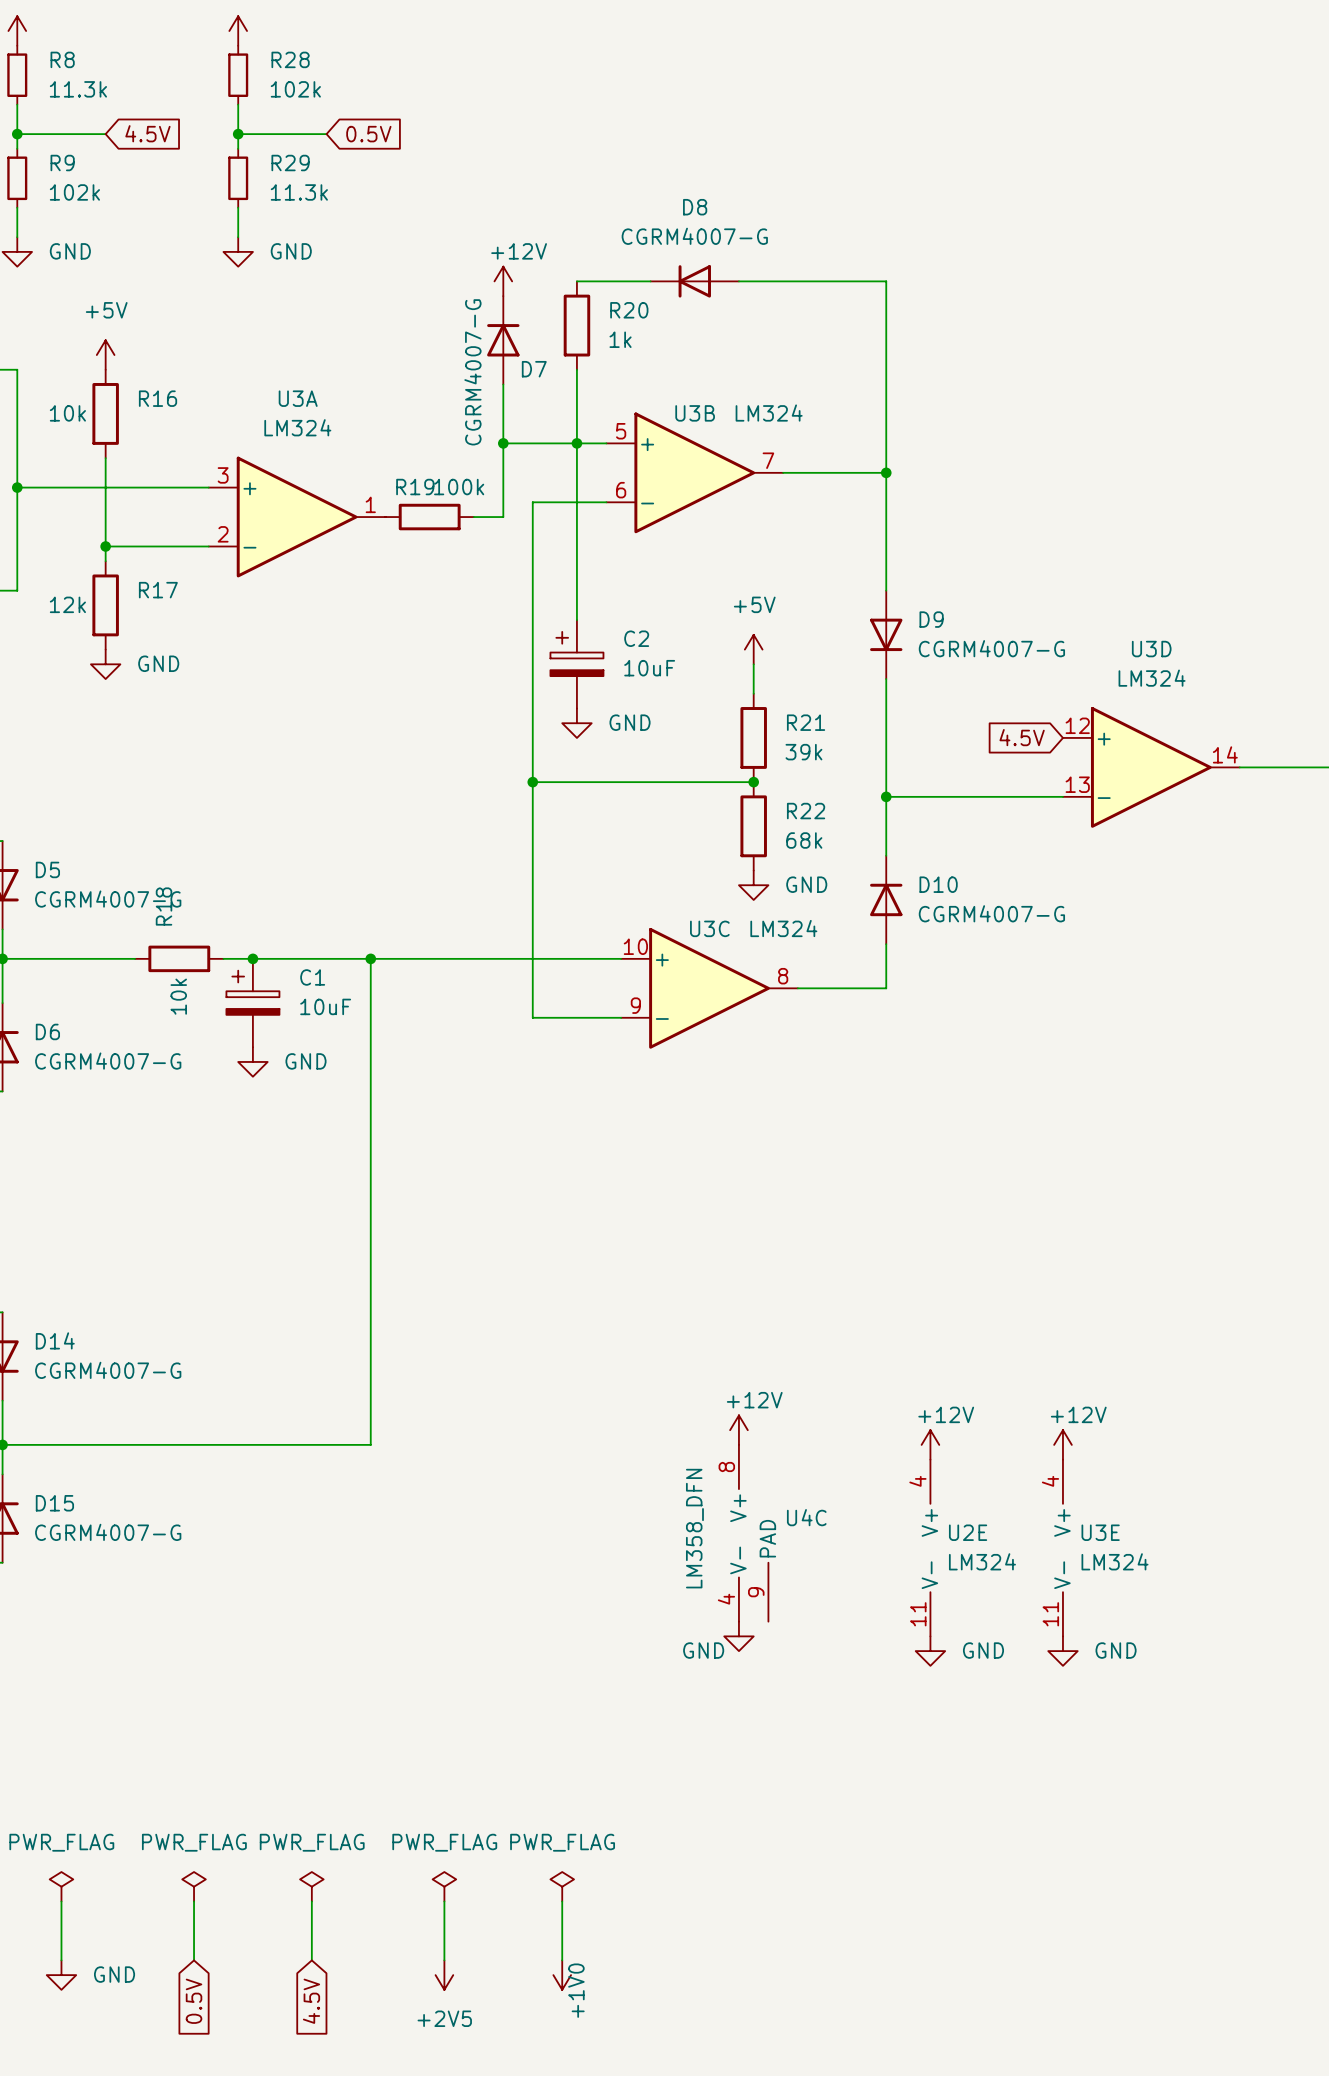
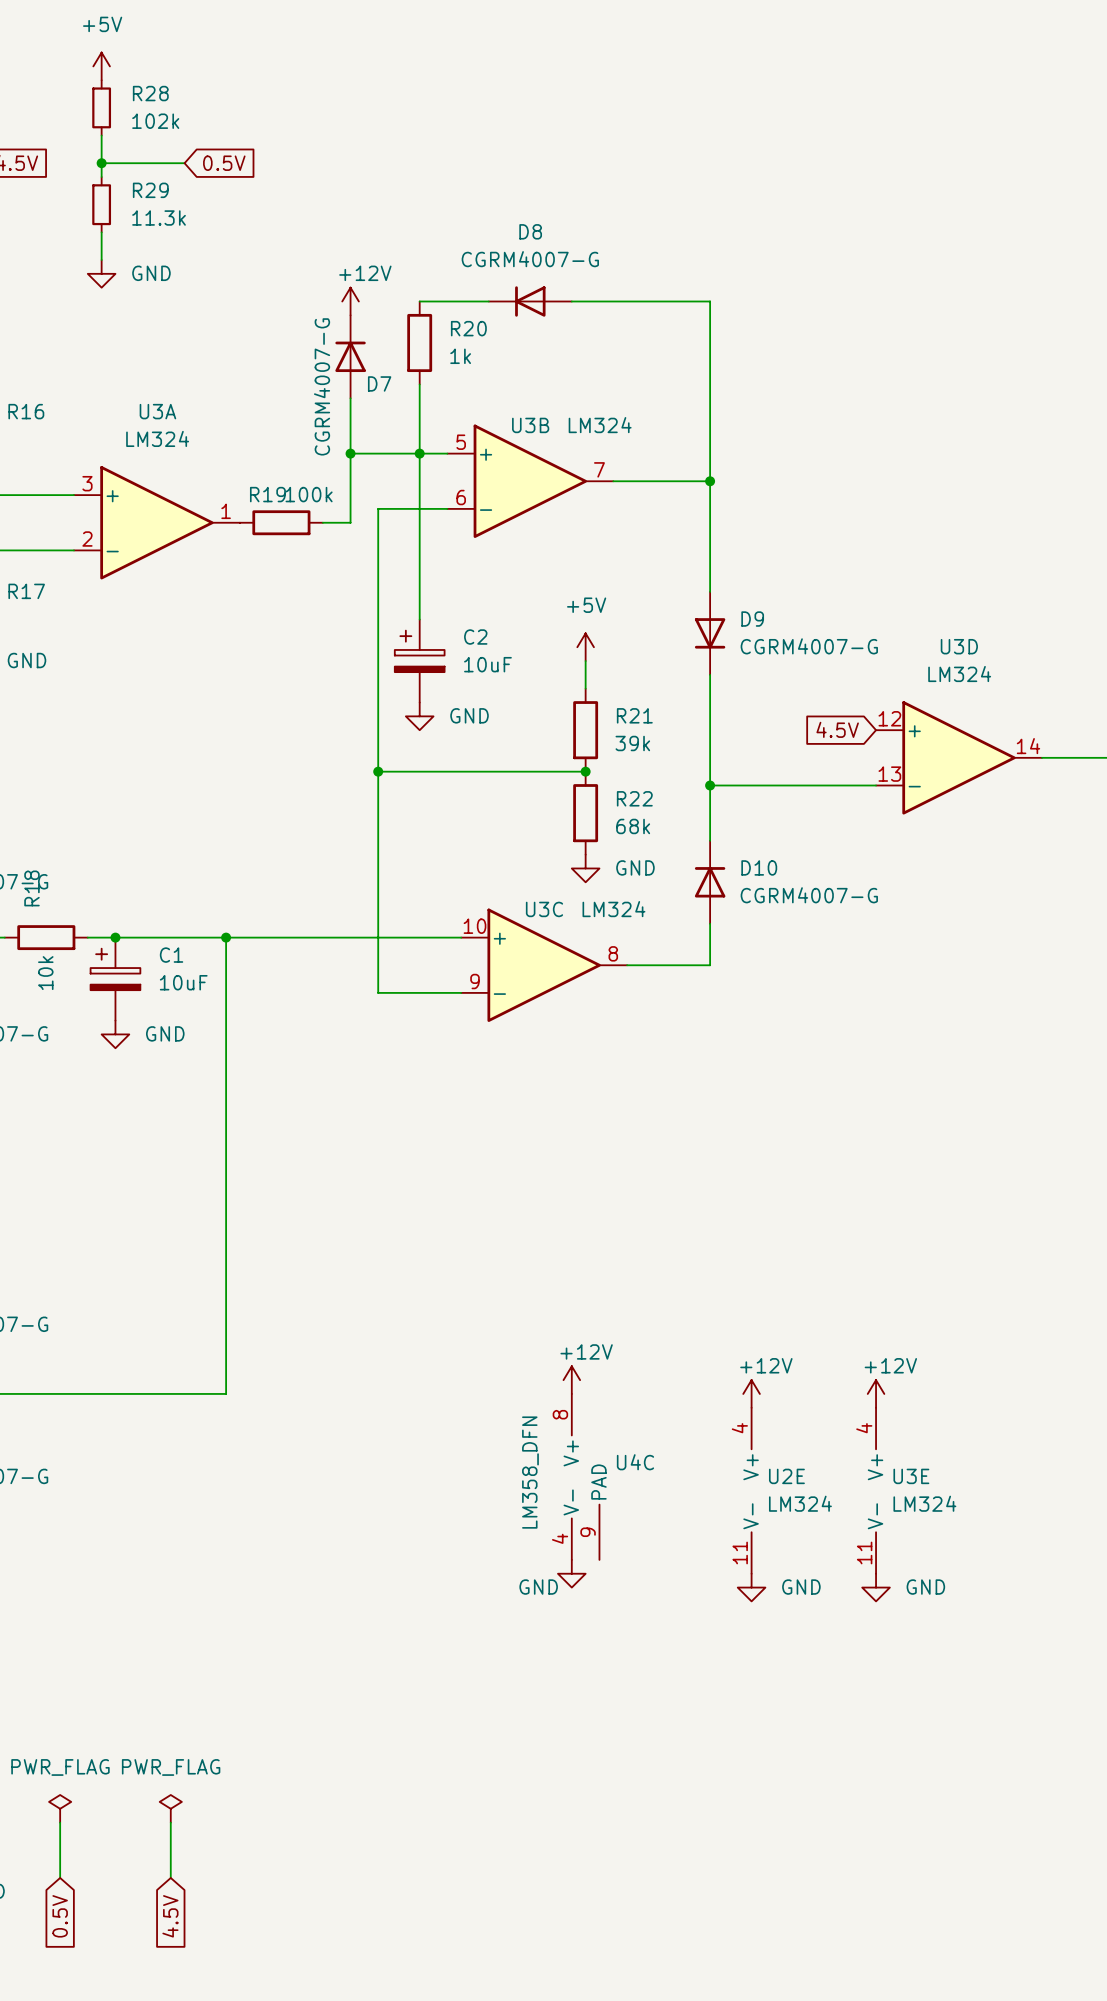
power symbol: PWR_FLAG (444, 1886) -> none
power symbol: PWR_FLAG (562, 1886) -> none
wire: (444, 1901) (444, 1960) -> none
wire: (562, 1901) (562, 1960) -> none
power symbol: +2V5 (444, 1975) -> none
power symbol: +1V0 (562, 1975) -> none

